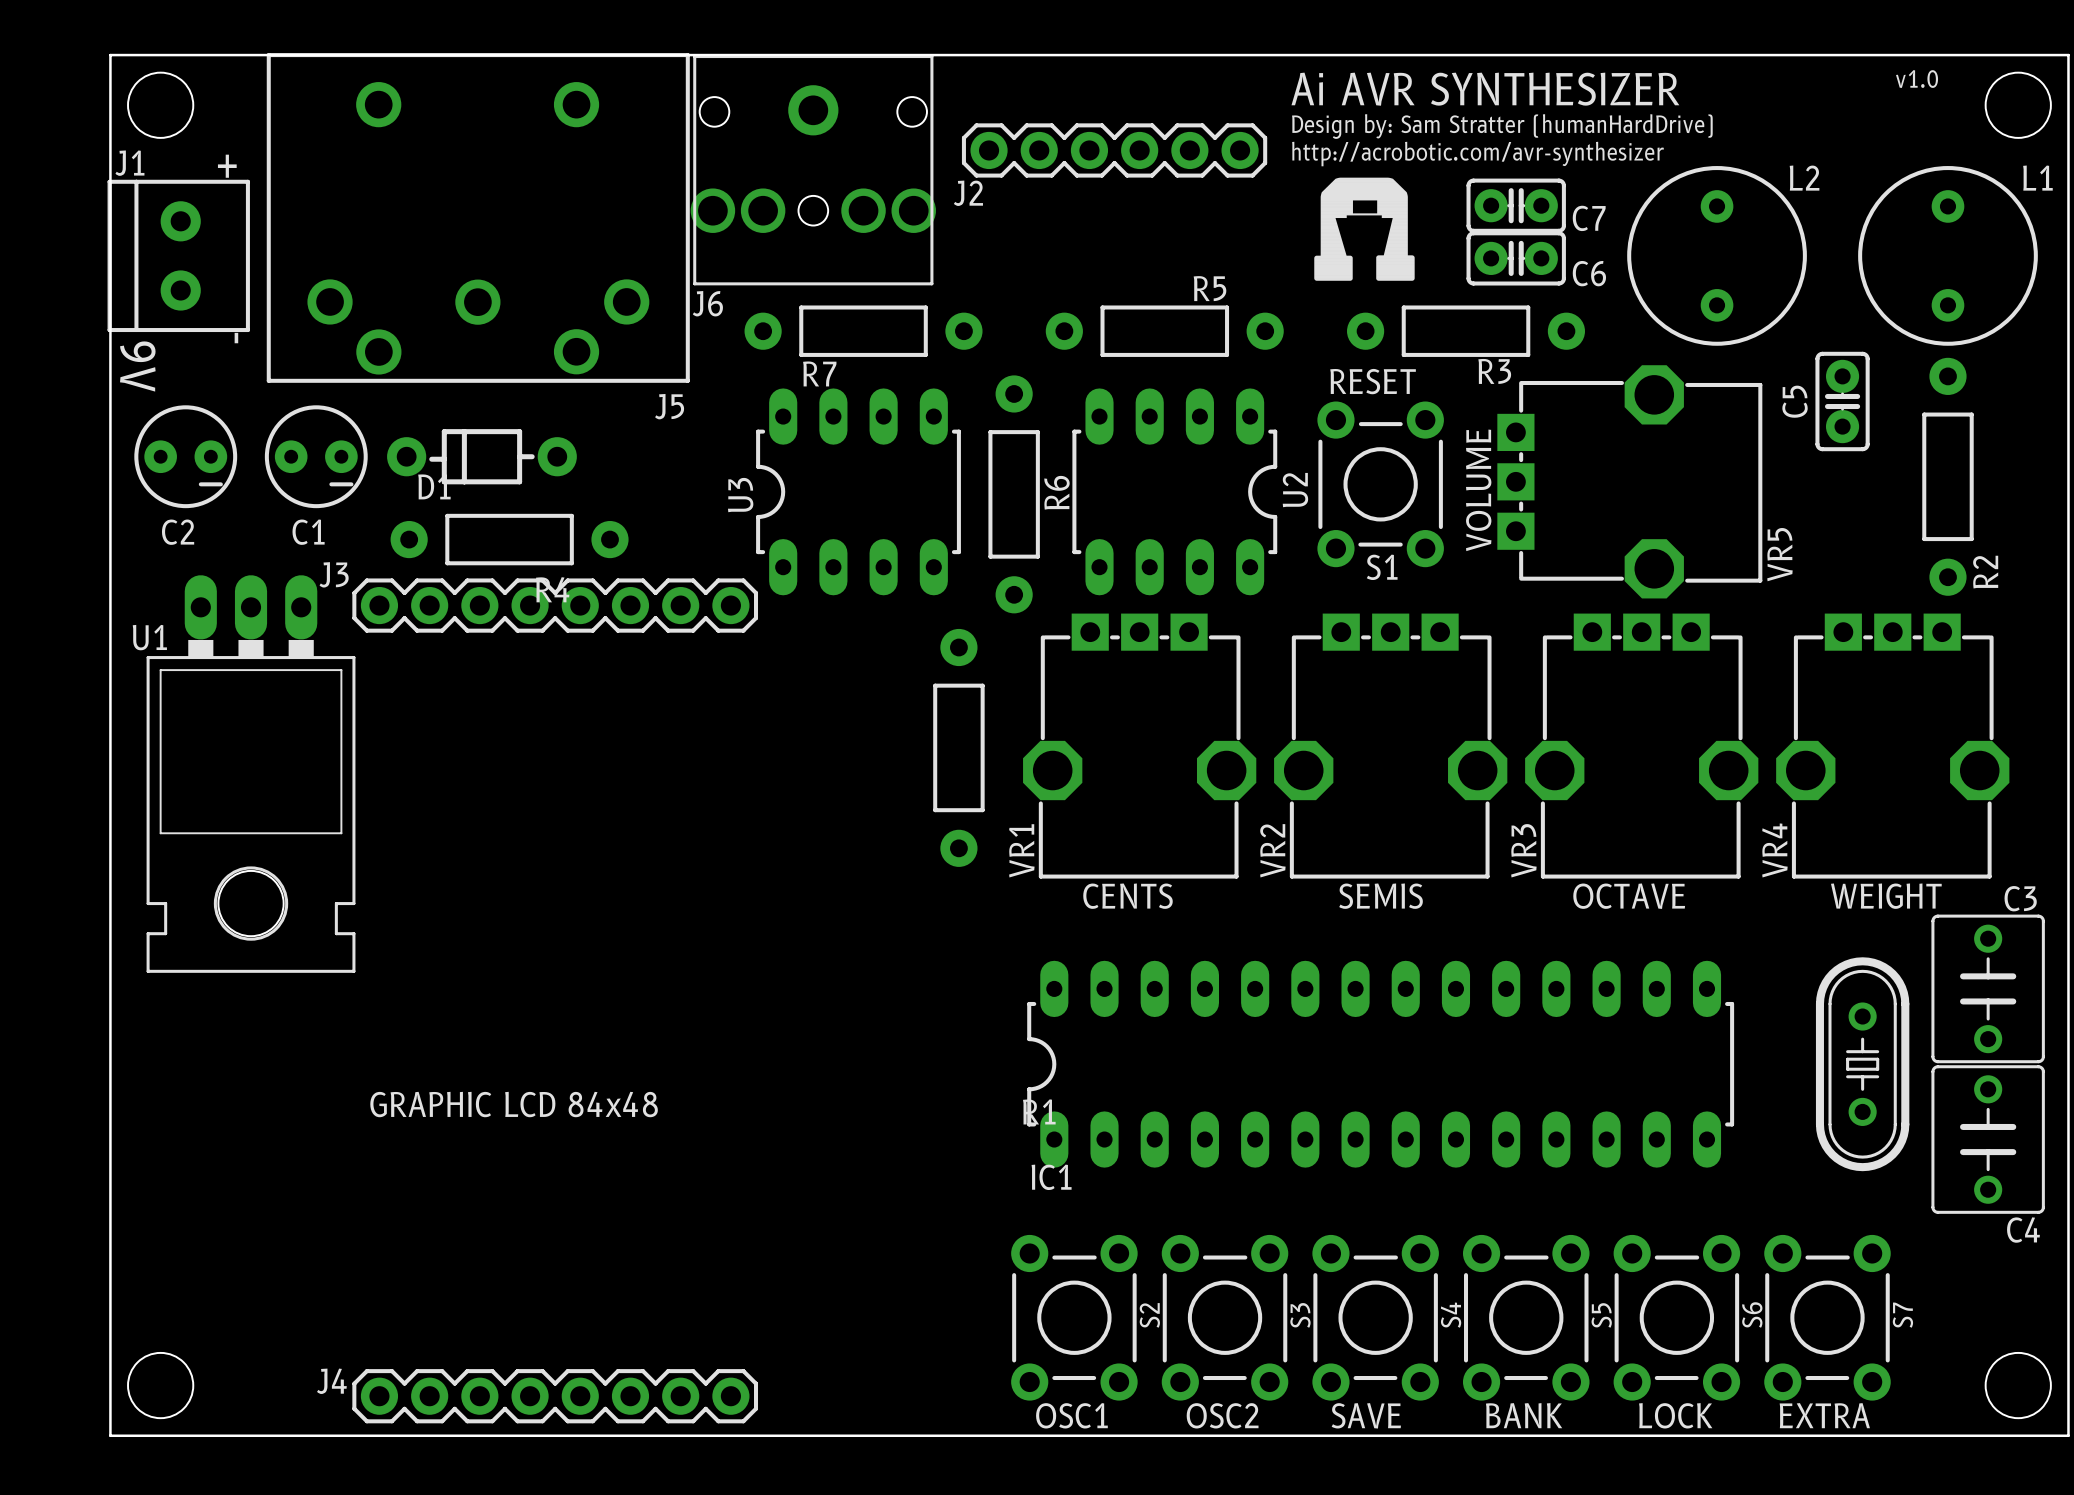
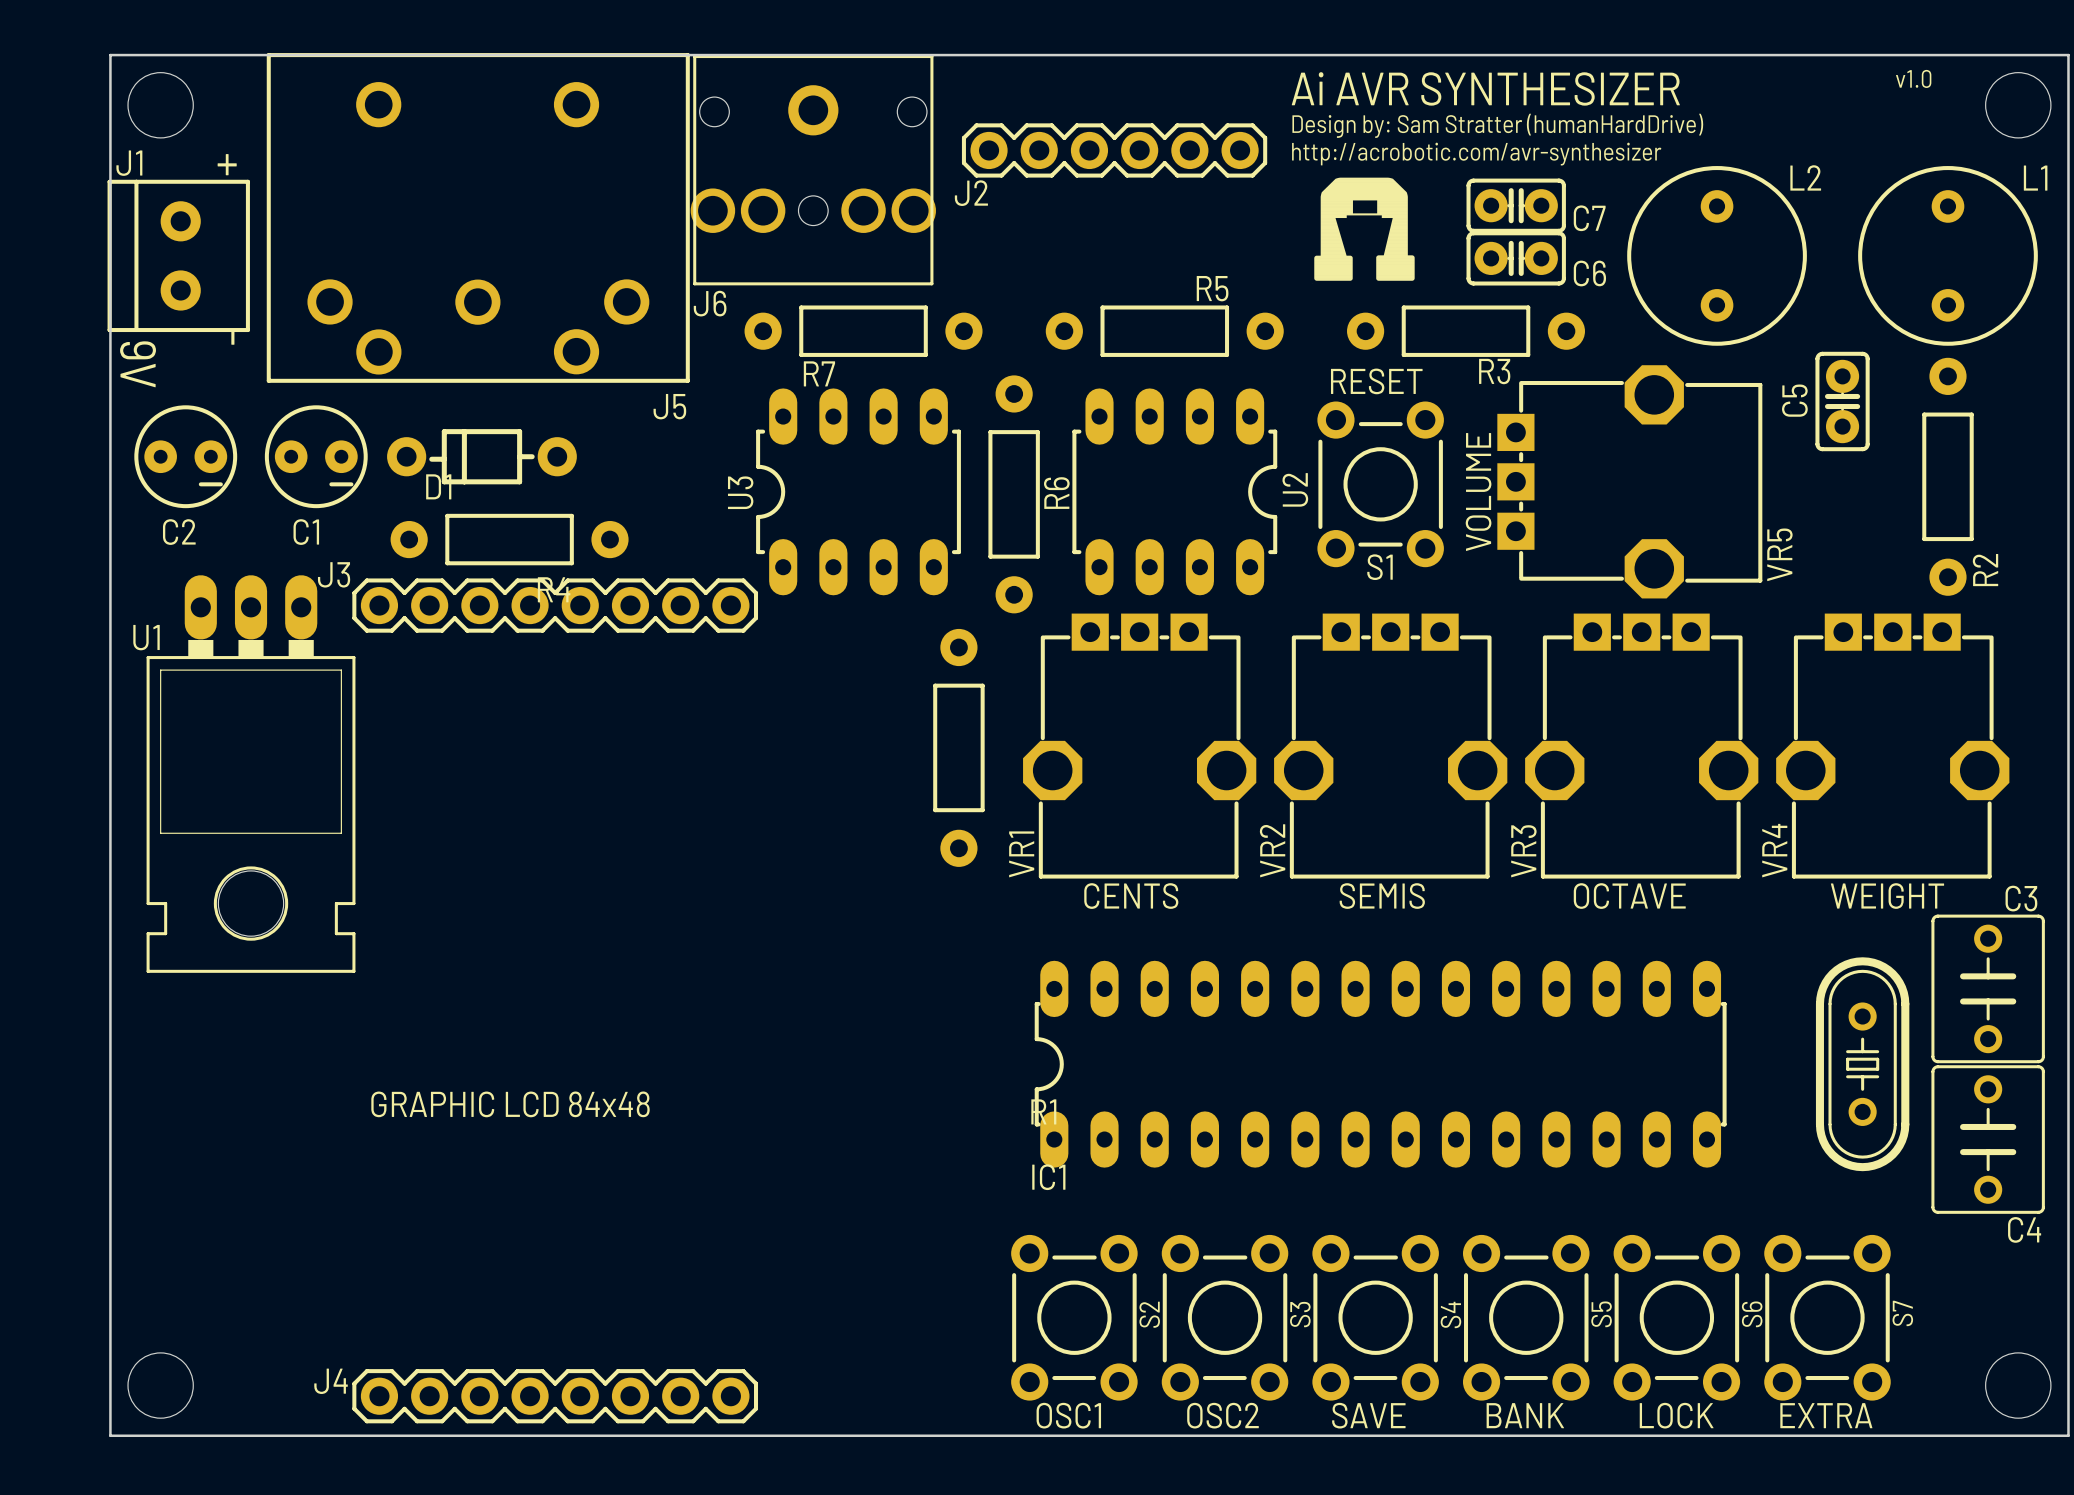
IC1 footprint: [1027, 960, 1735, 1168] -> [1034, 960, 1727, 1168]

